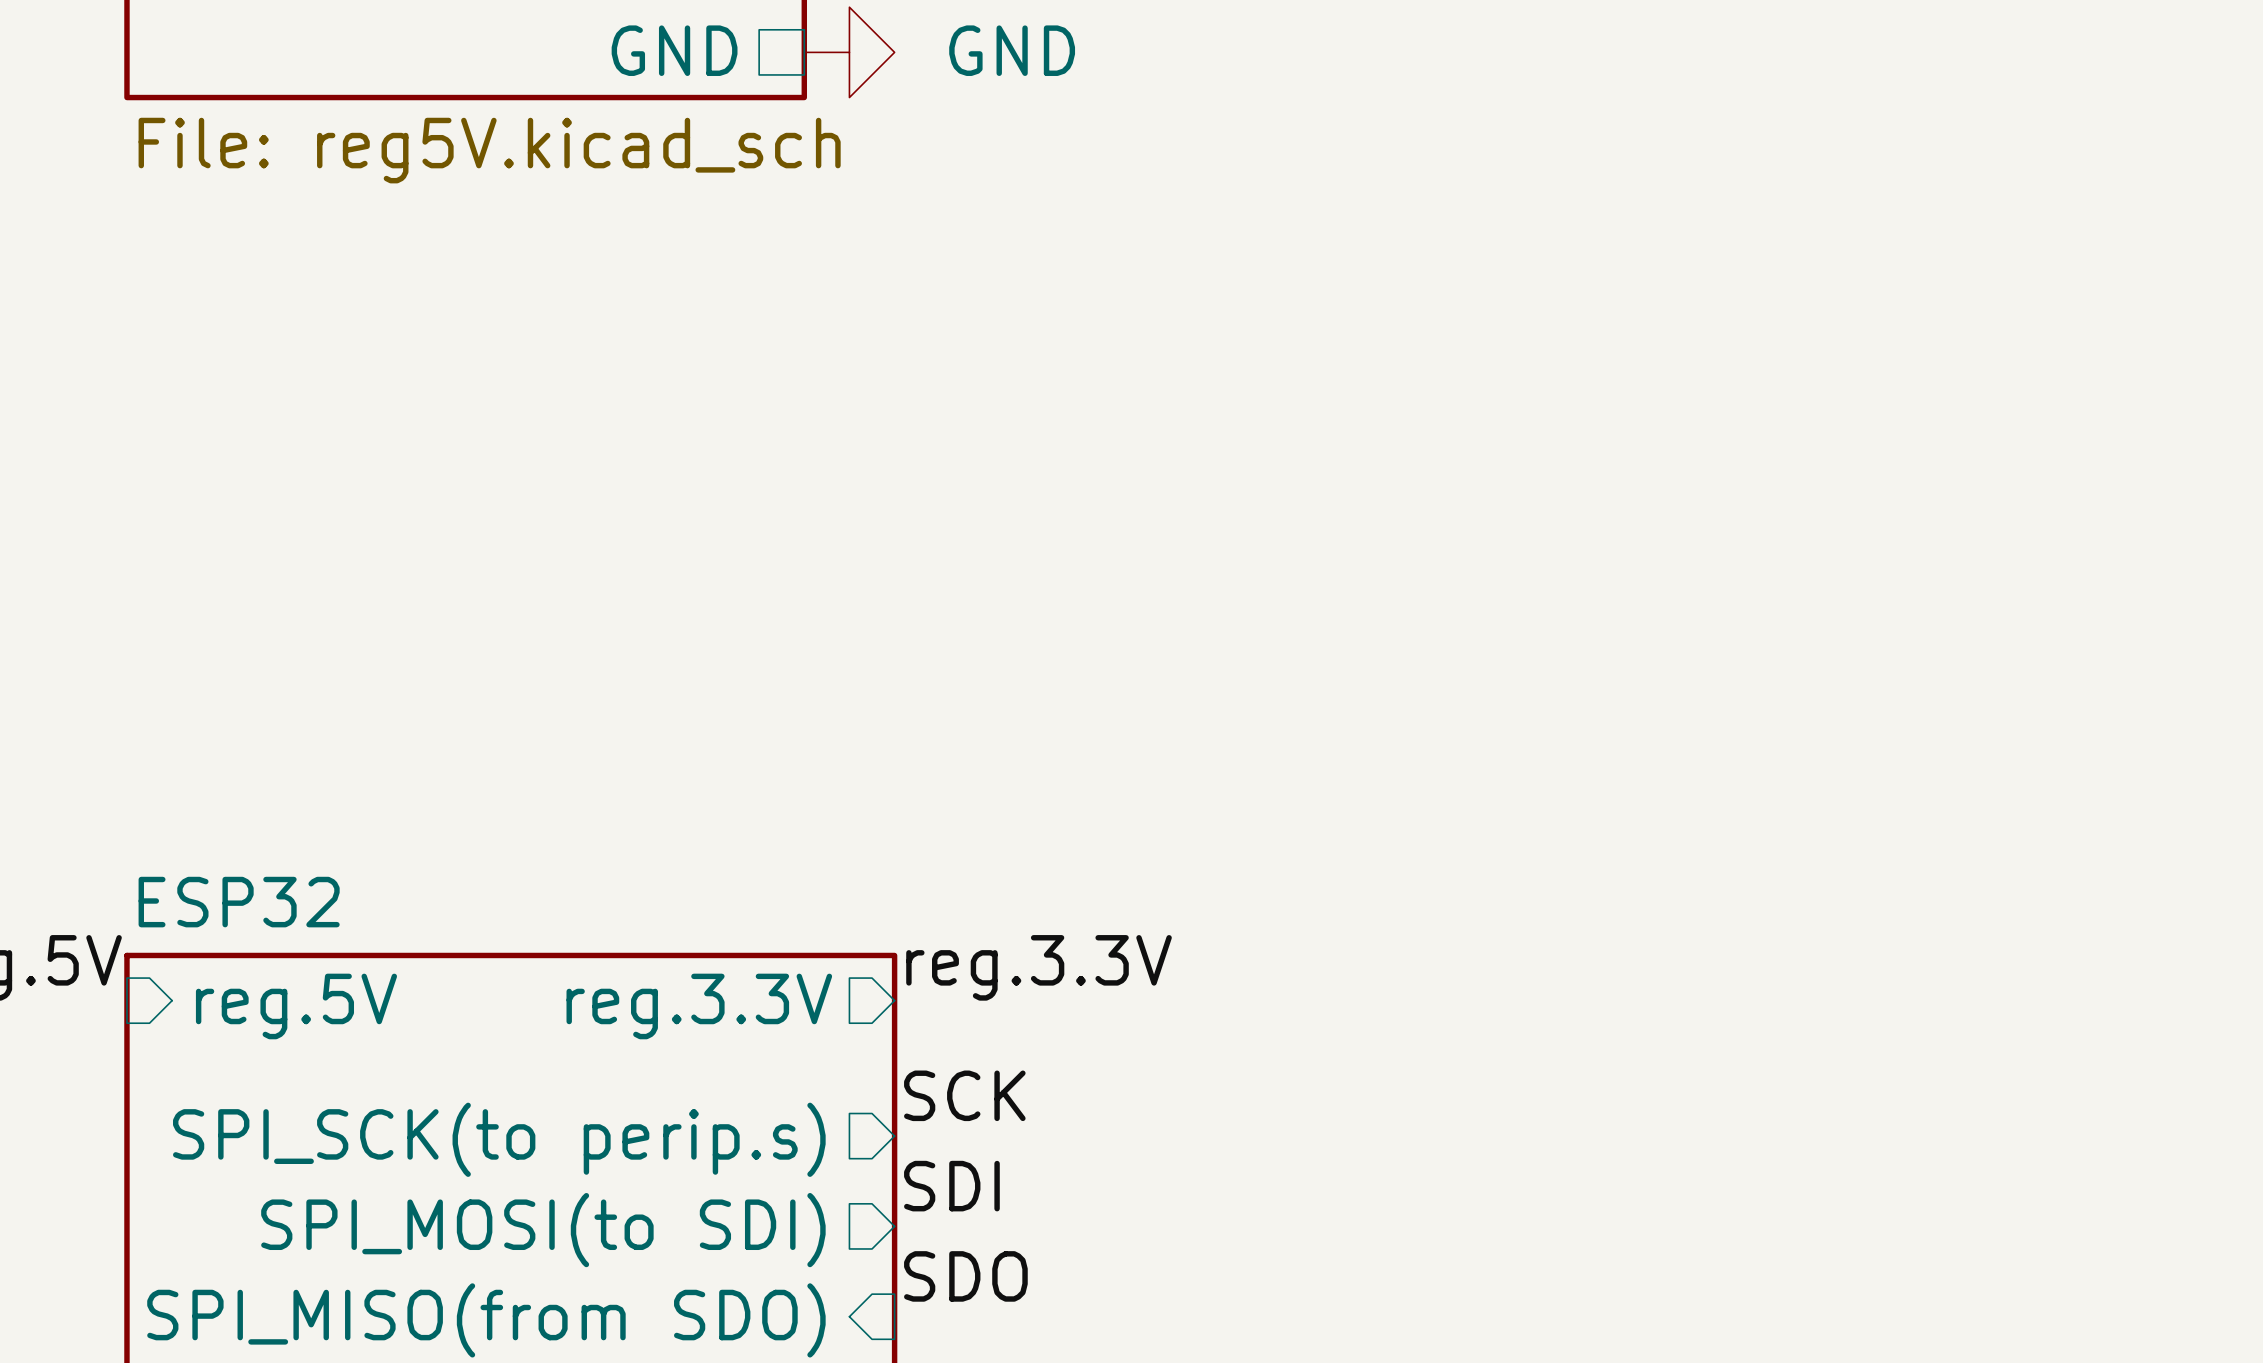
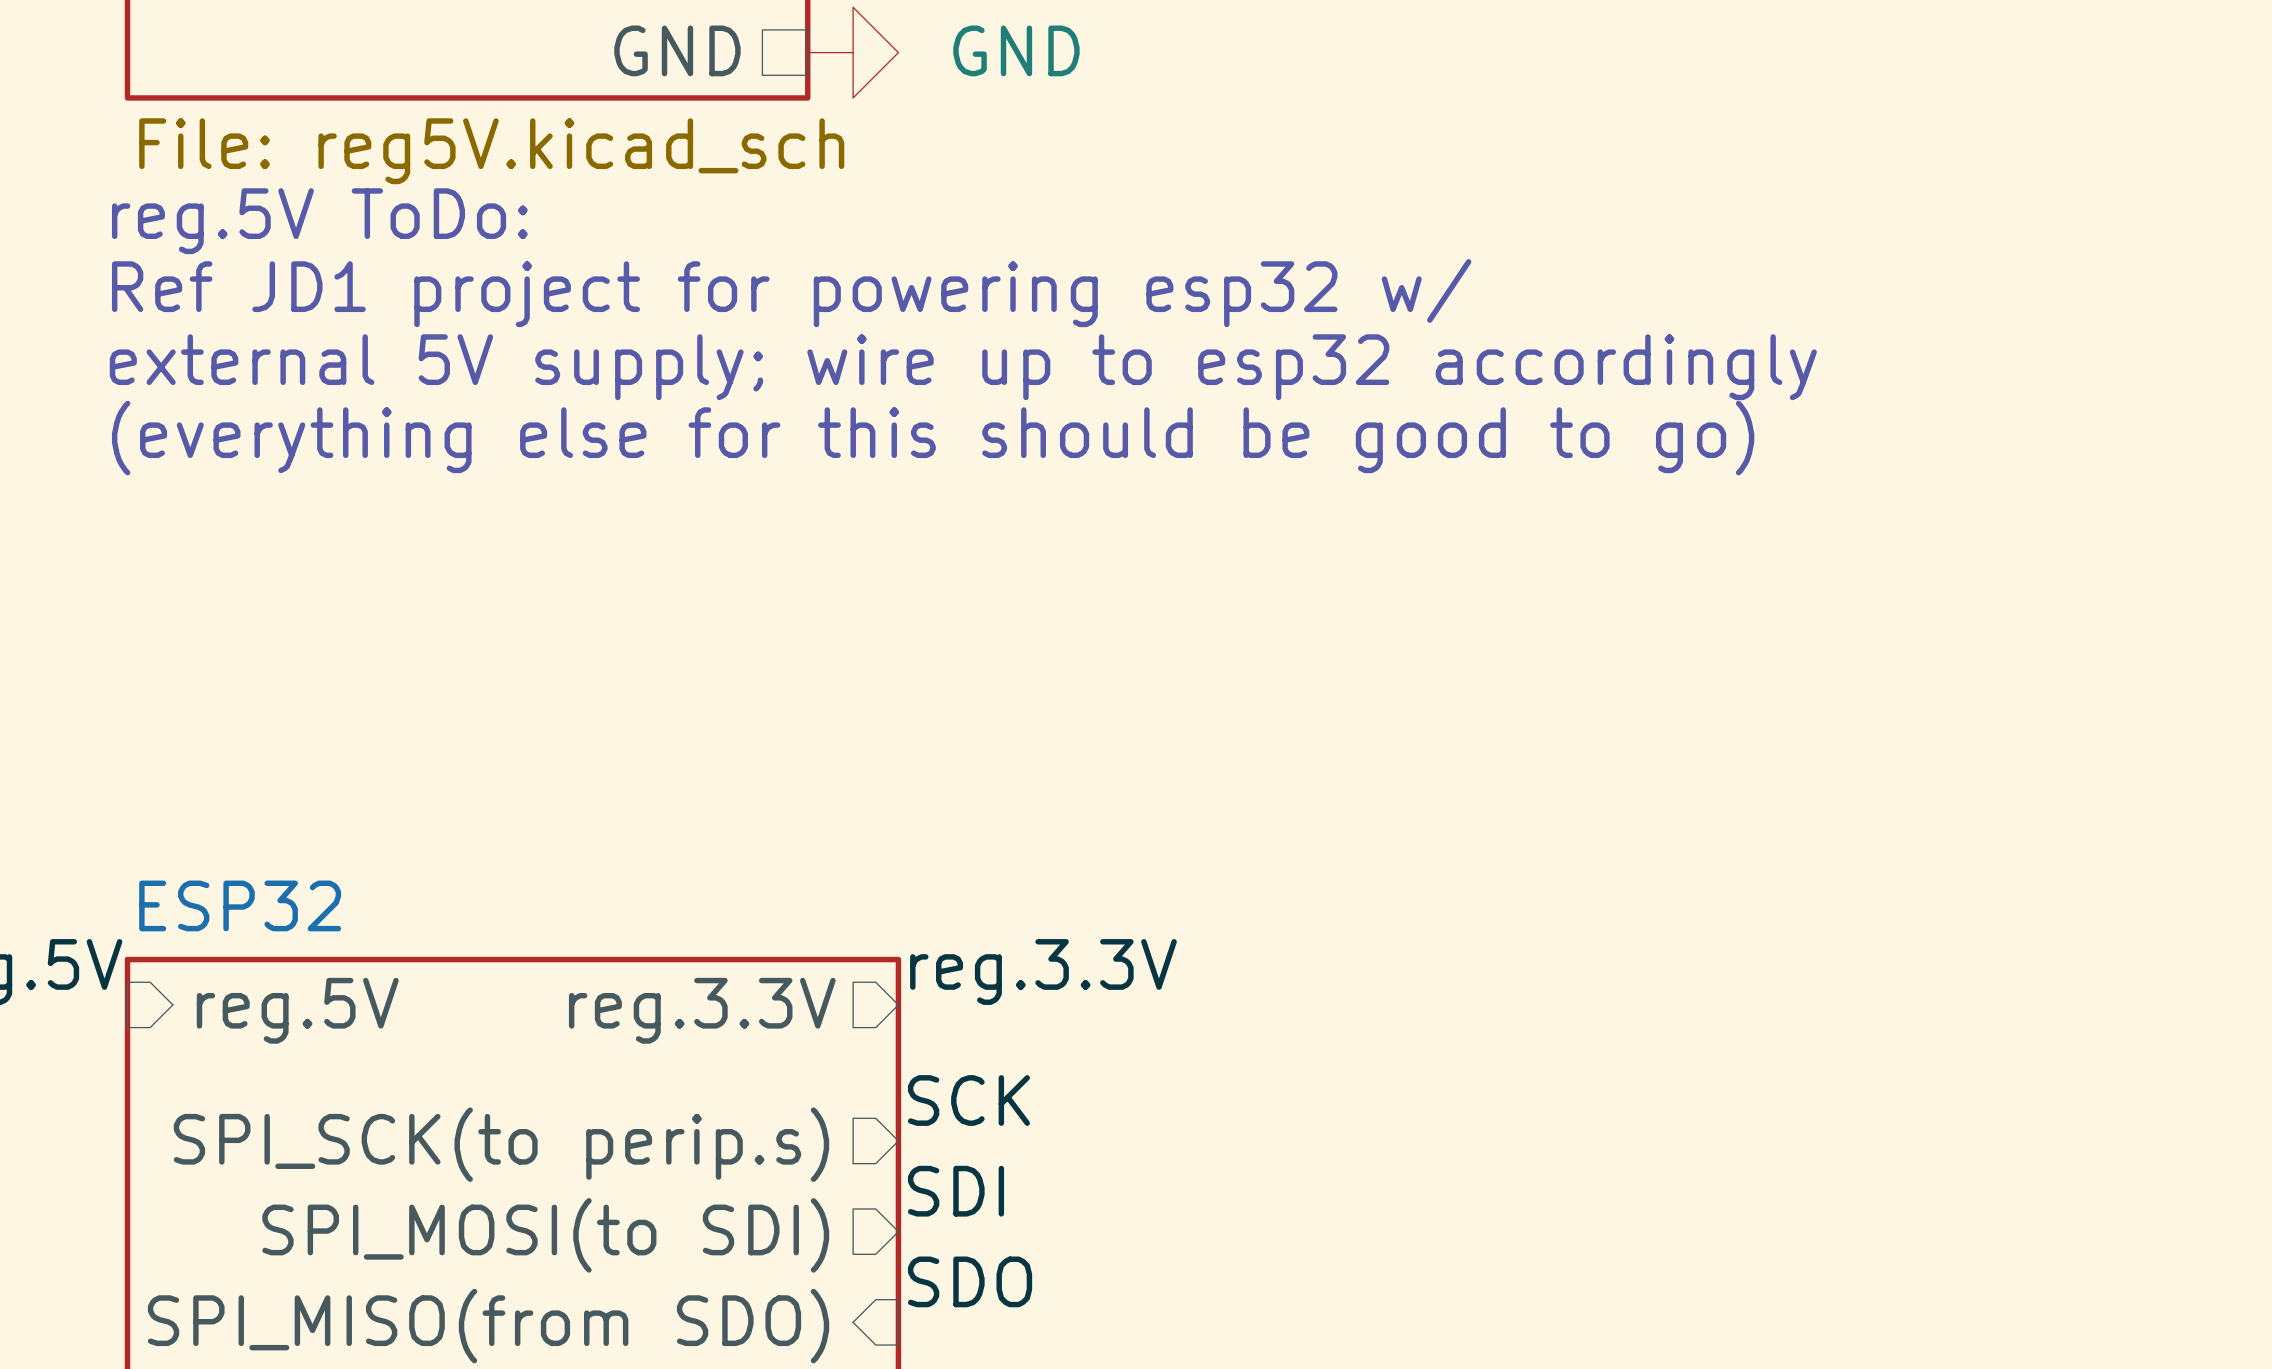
text: none -> reg.5V ToDo: (319, 221)
text: none -> Ref JD1 project for powering esp32 w/ (791, 293)
text: none -> external 5V supply; wire up to esp32 accordingly (963, 367)
text: none -> (everything else for this should be good to go) (933, 438)

